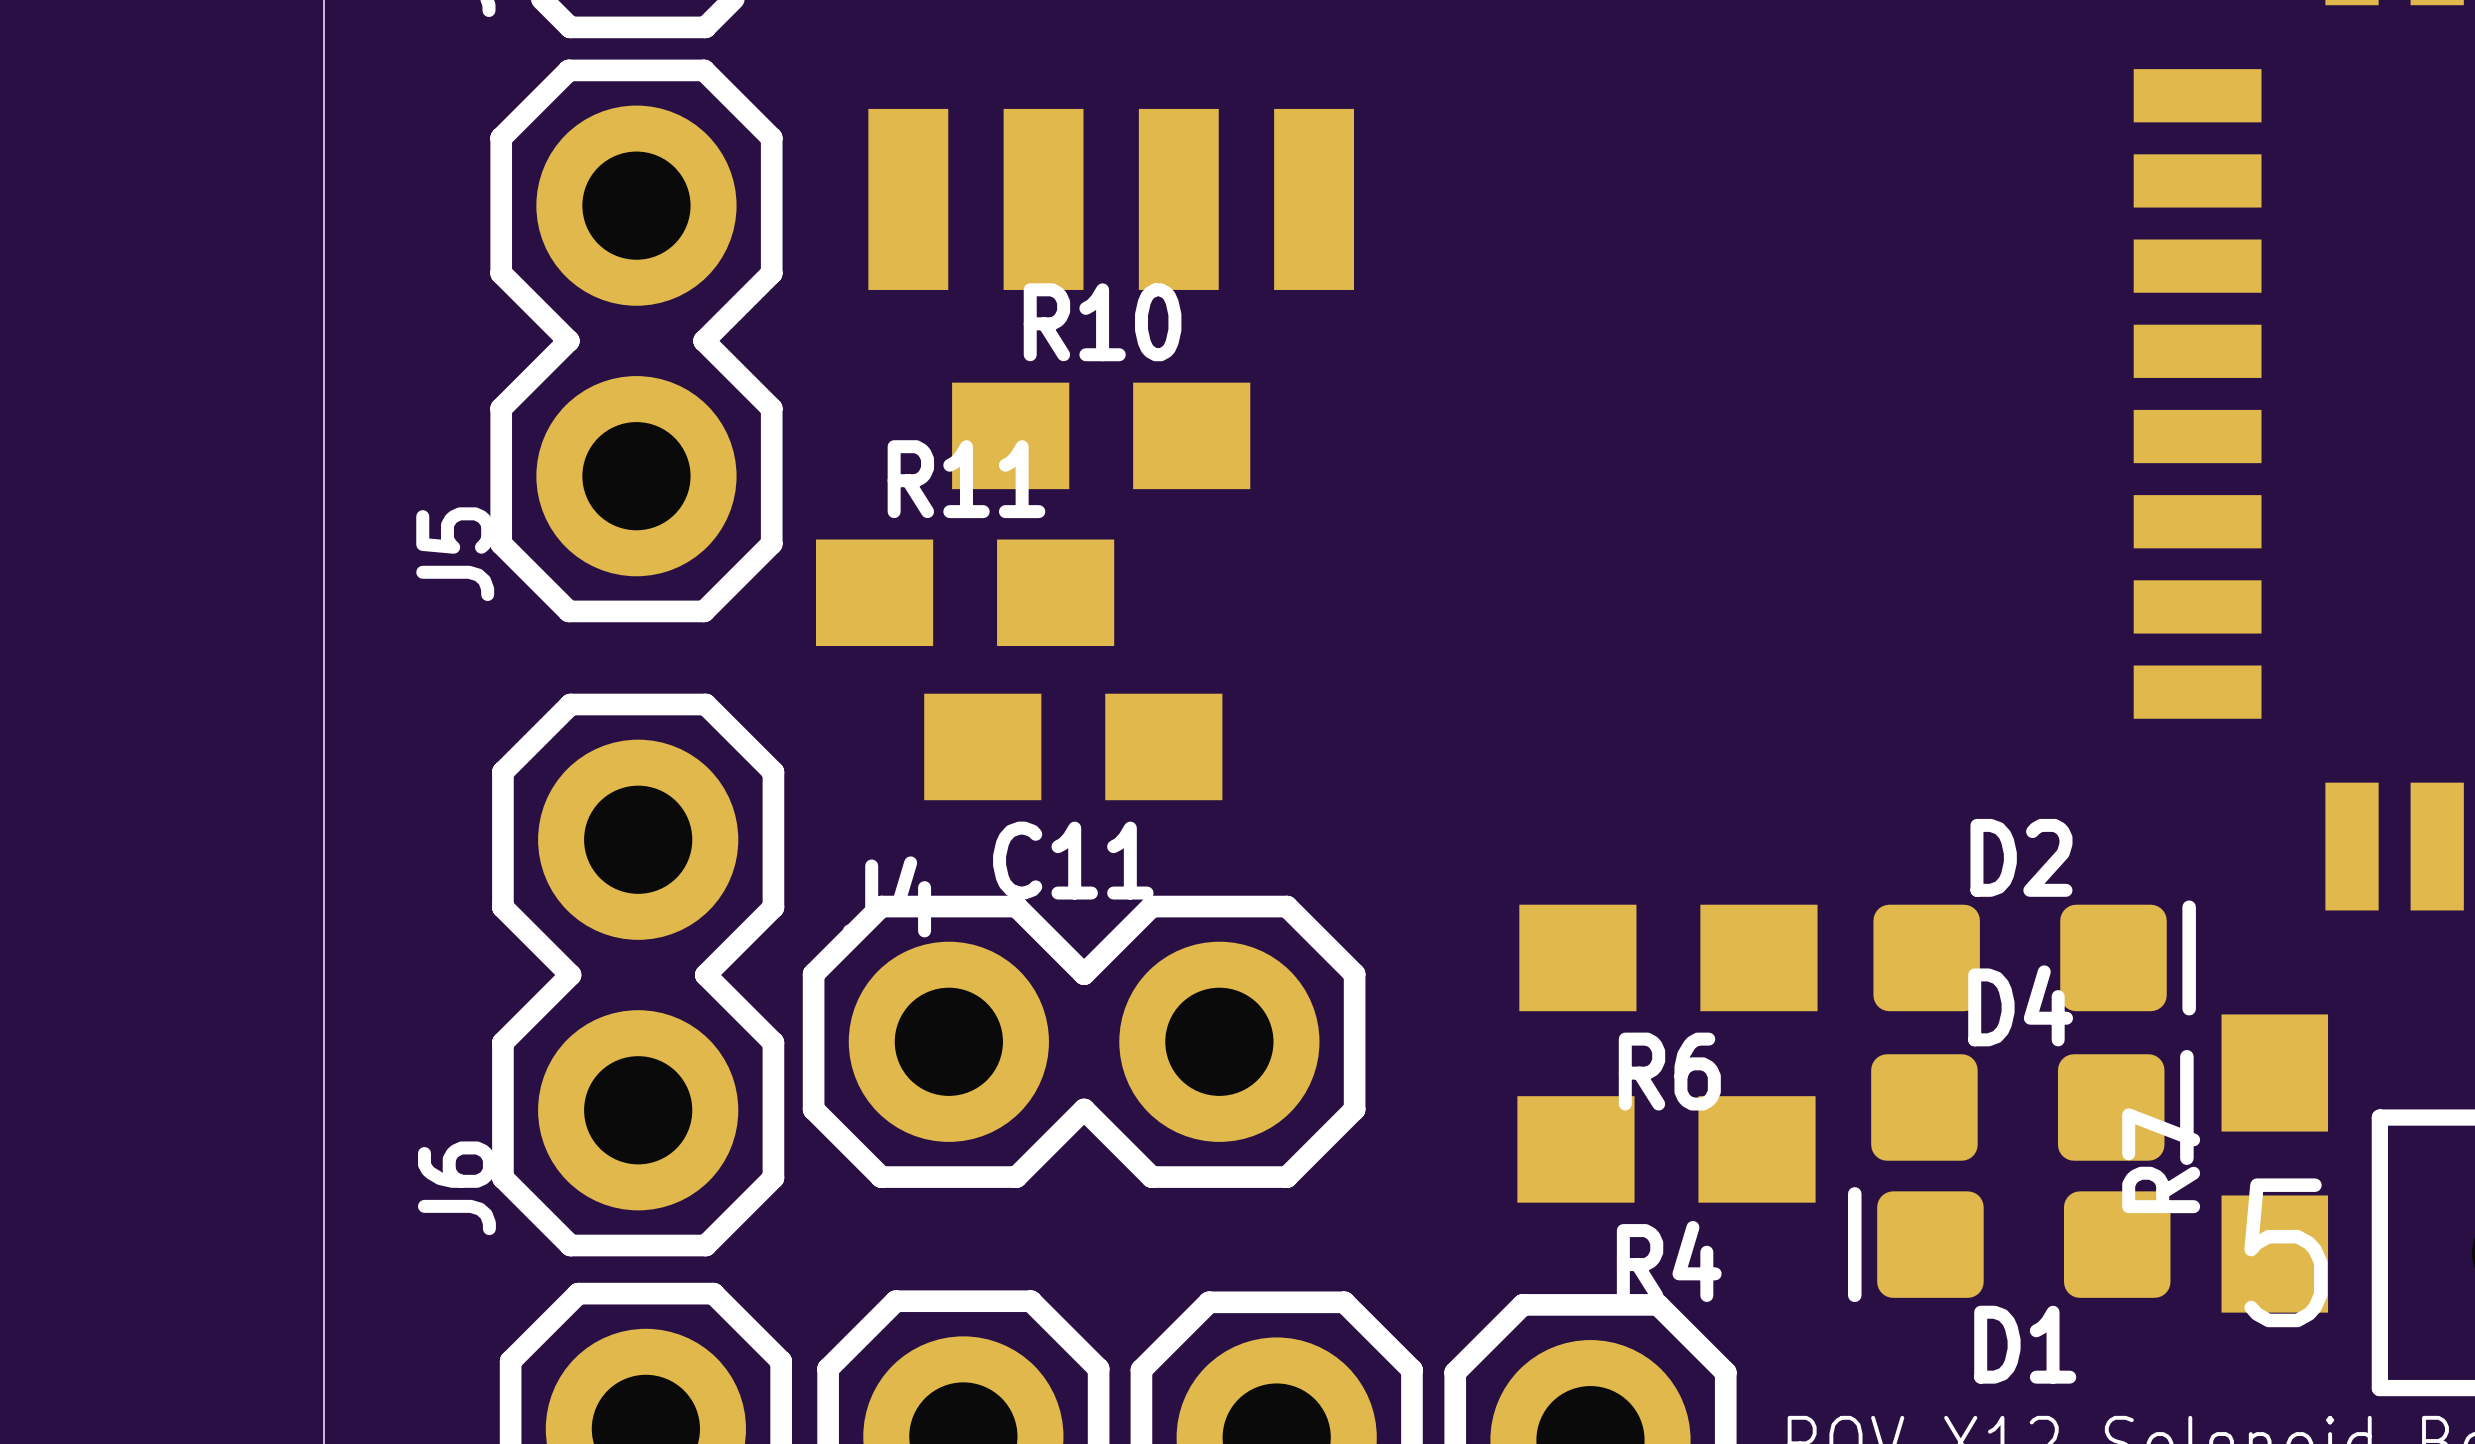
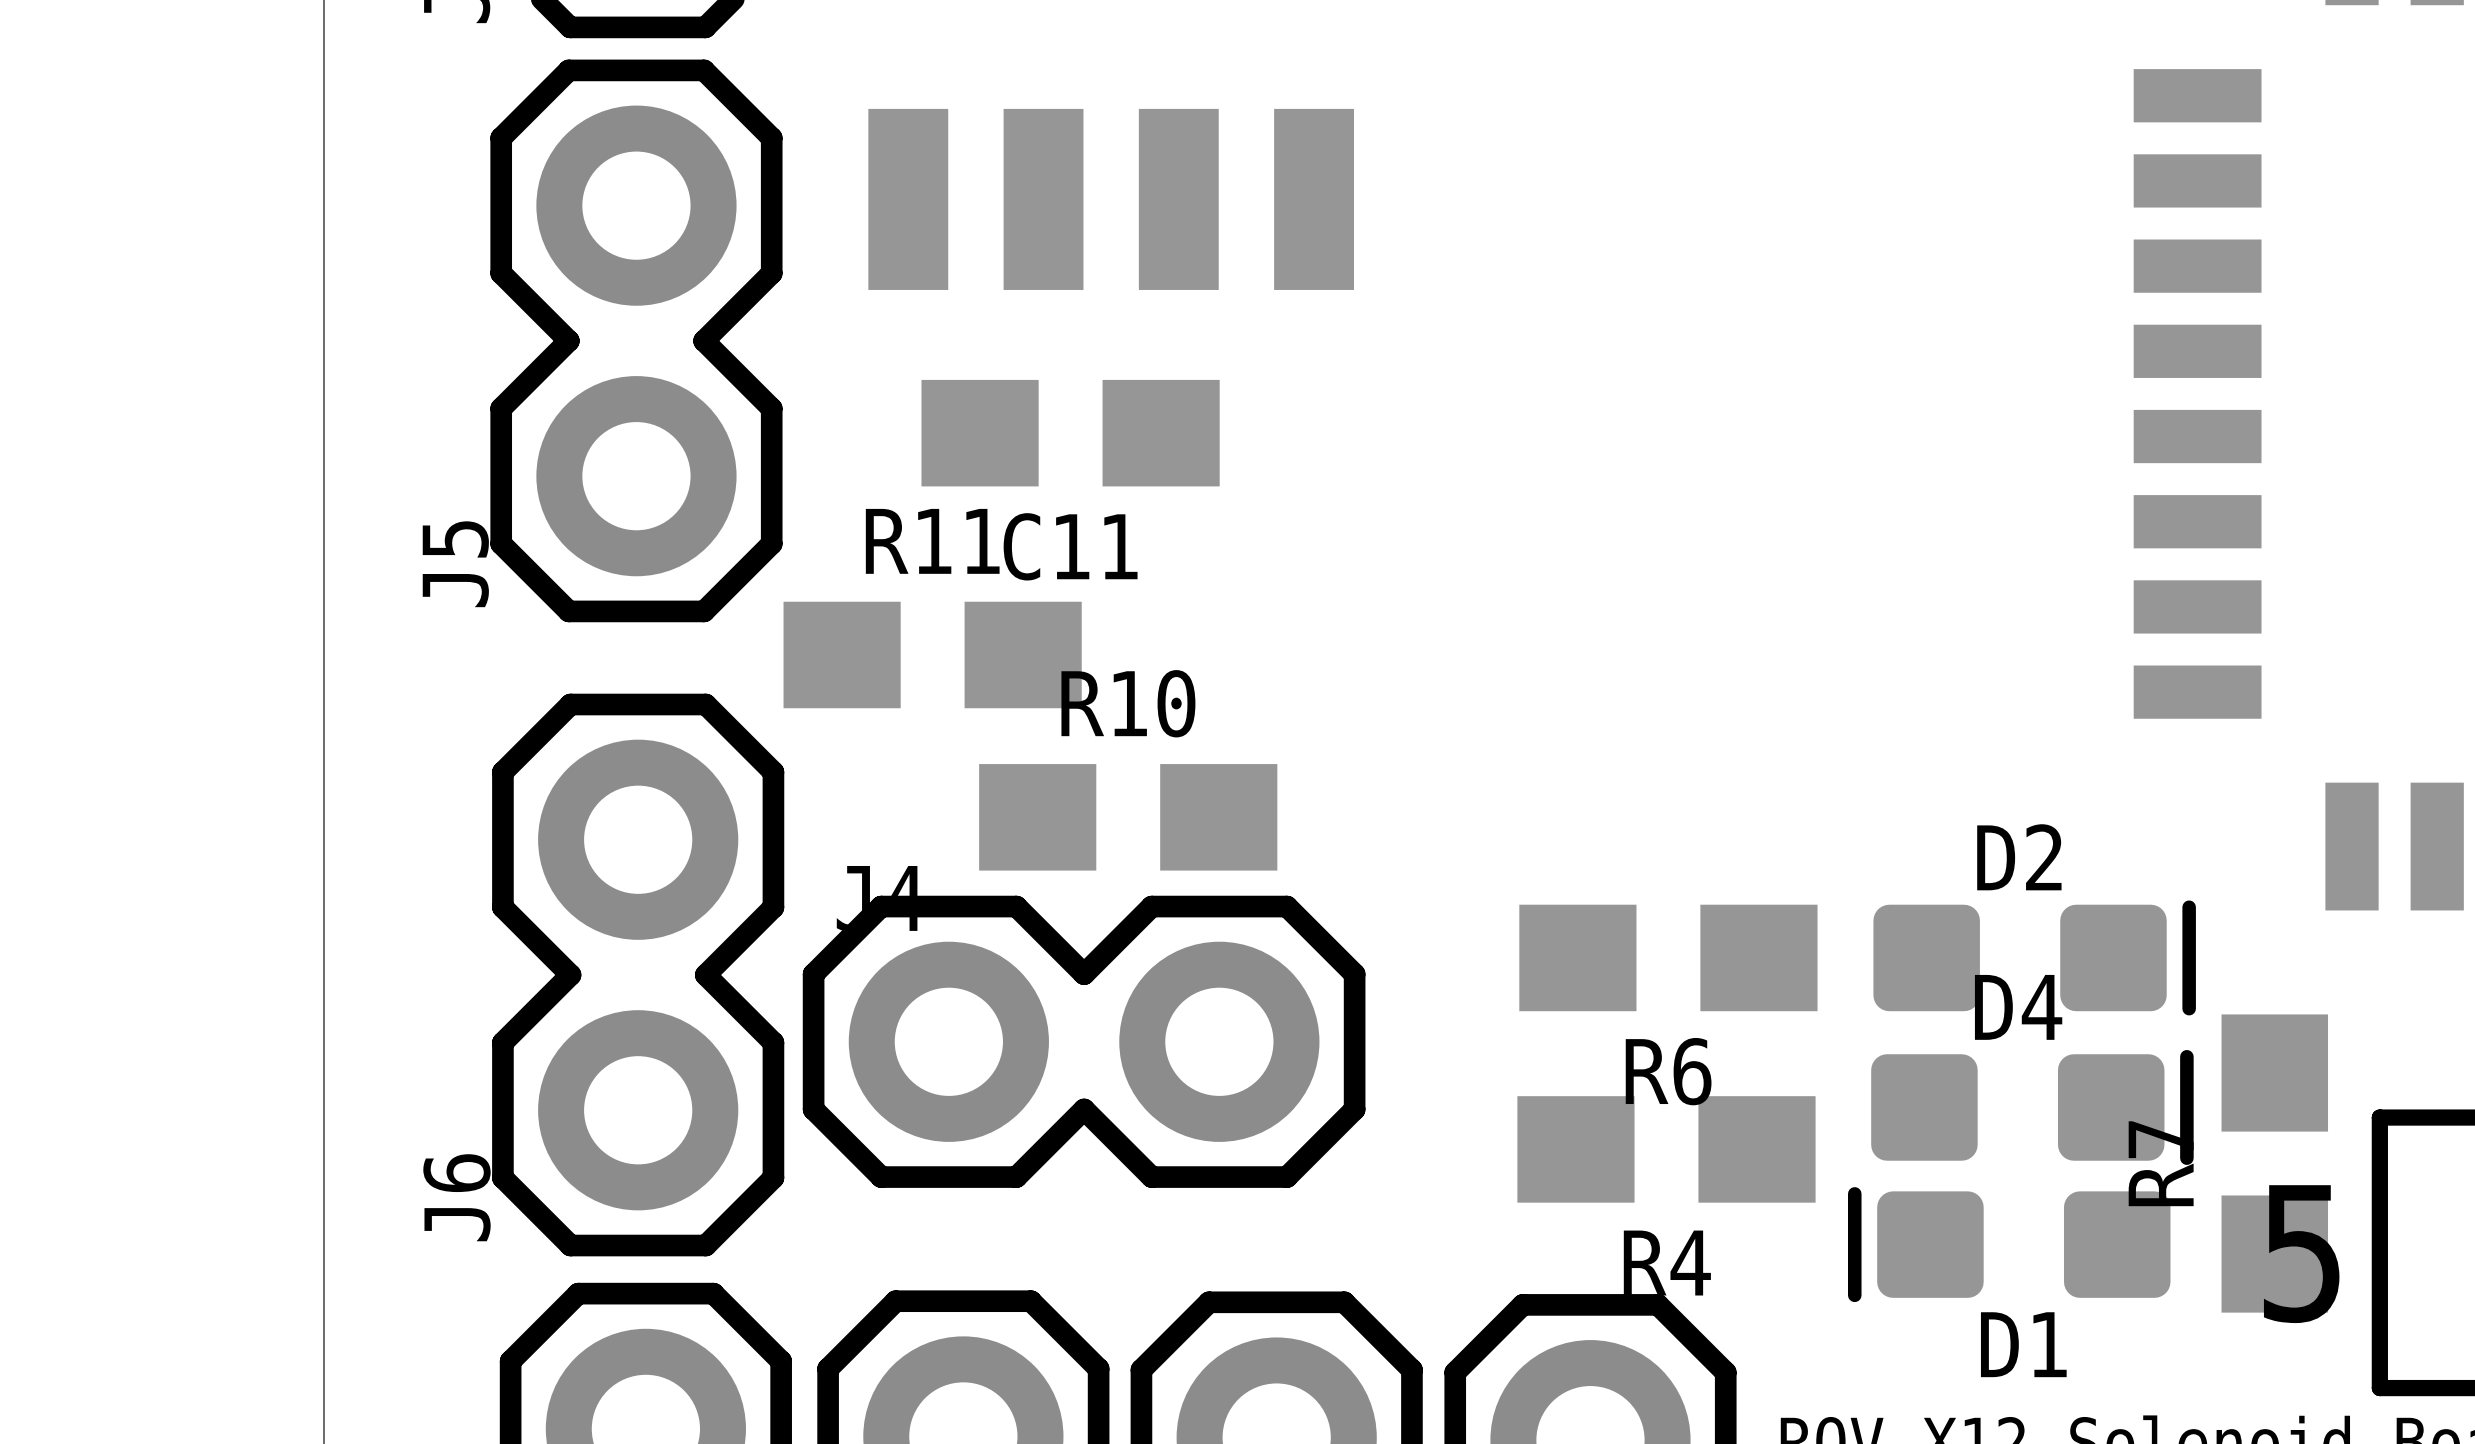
R10 name: R10 (1102, 322) -> C11 (1070, 546)
R10 position: (1101, 435) -> (1070, 433)
R11 position: (965, 592) -> (932, 654)
C11 position: (1073, 746) -> (1128, 817)
C11 name: C11 (1073, 860) -> R10 (1128, 703)

